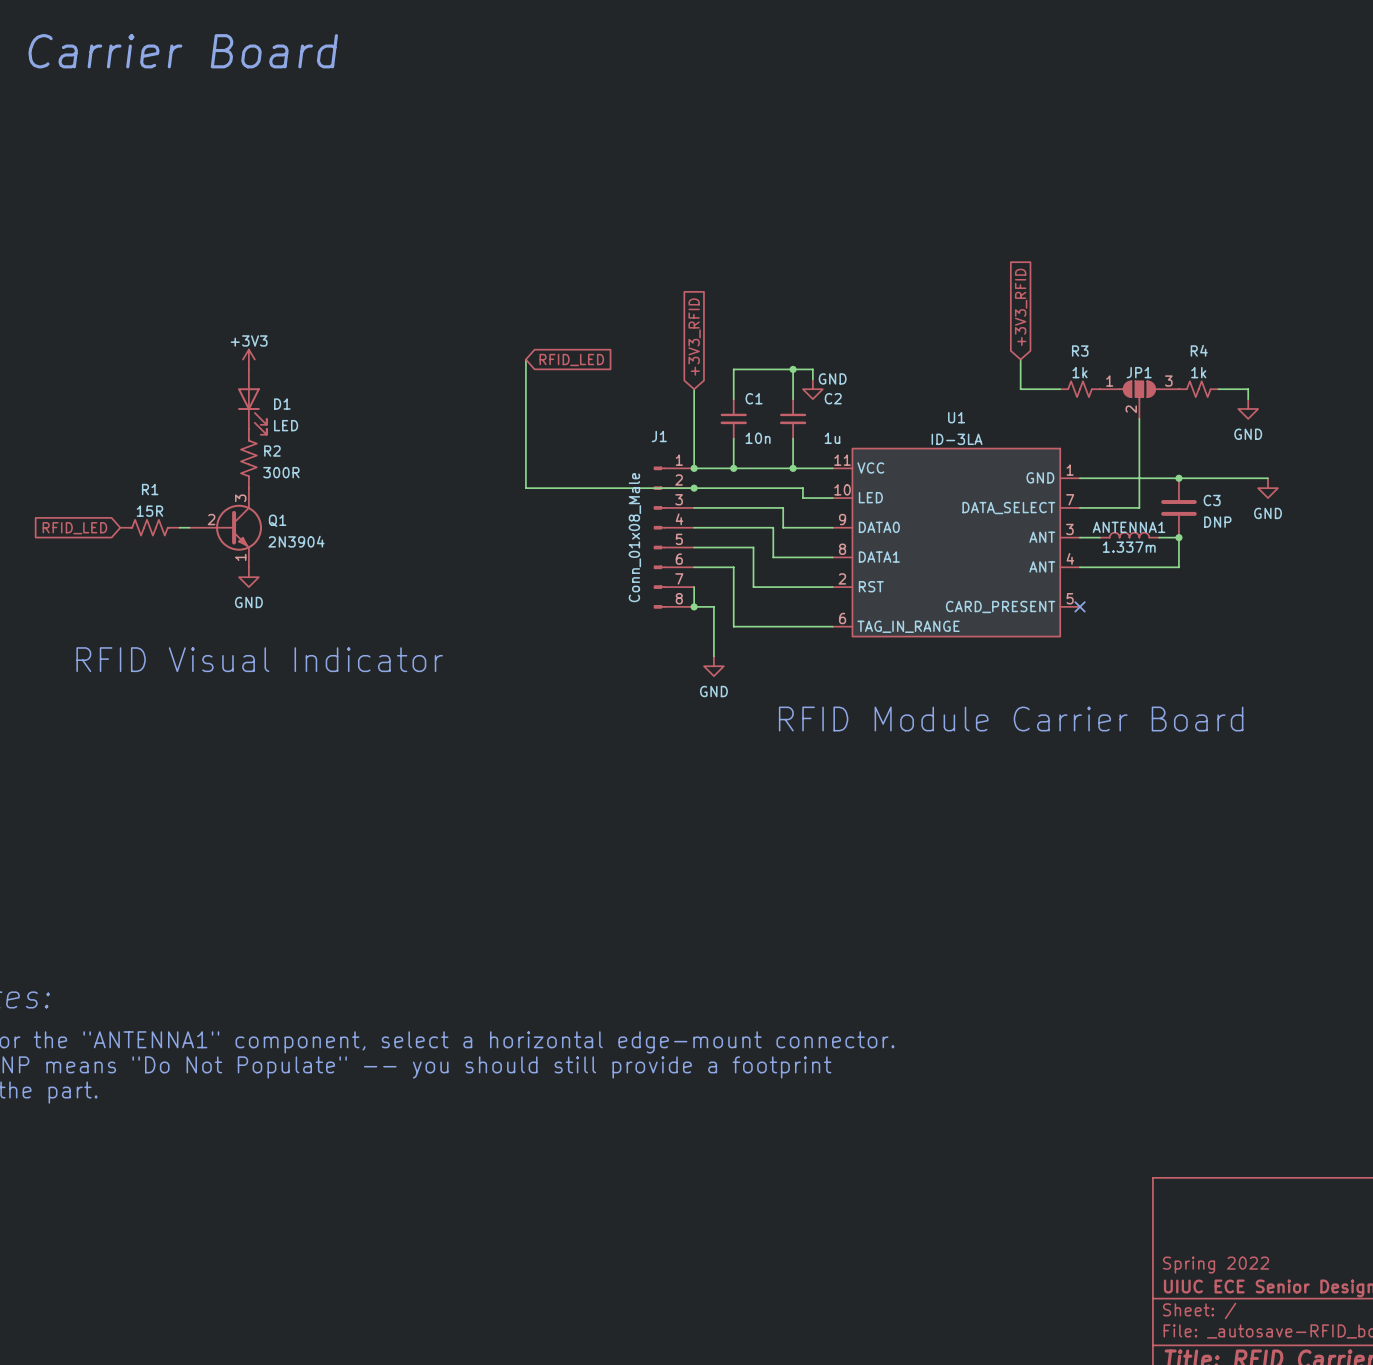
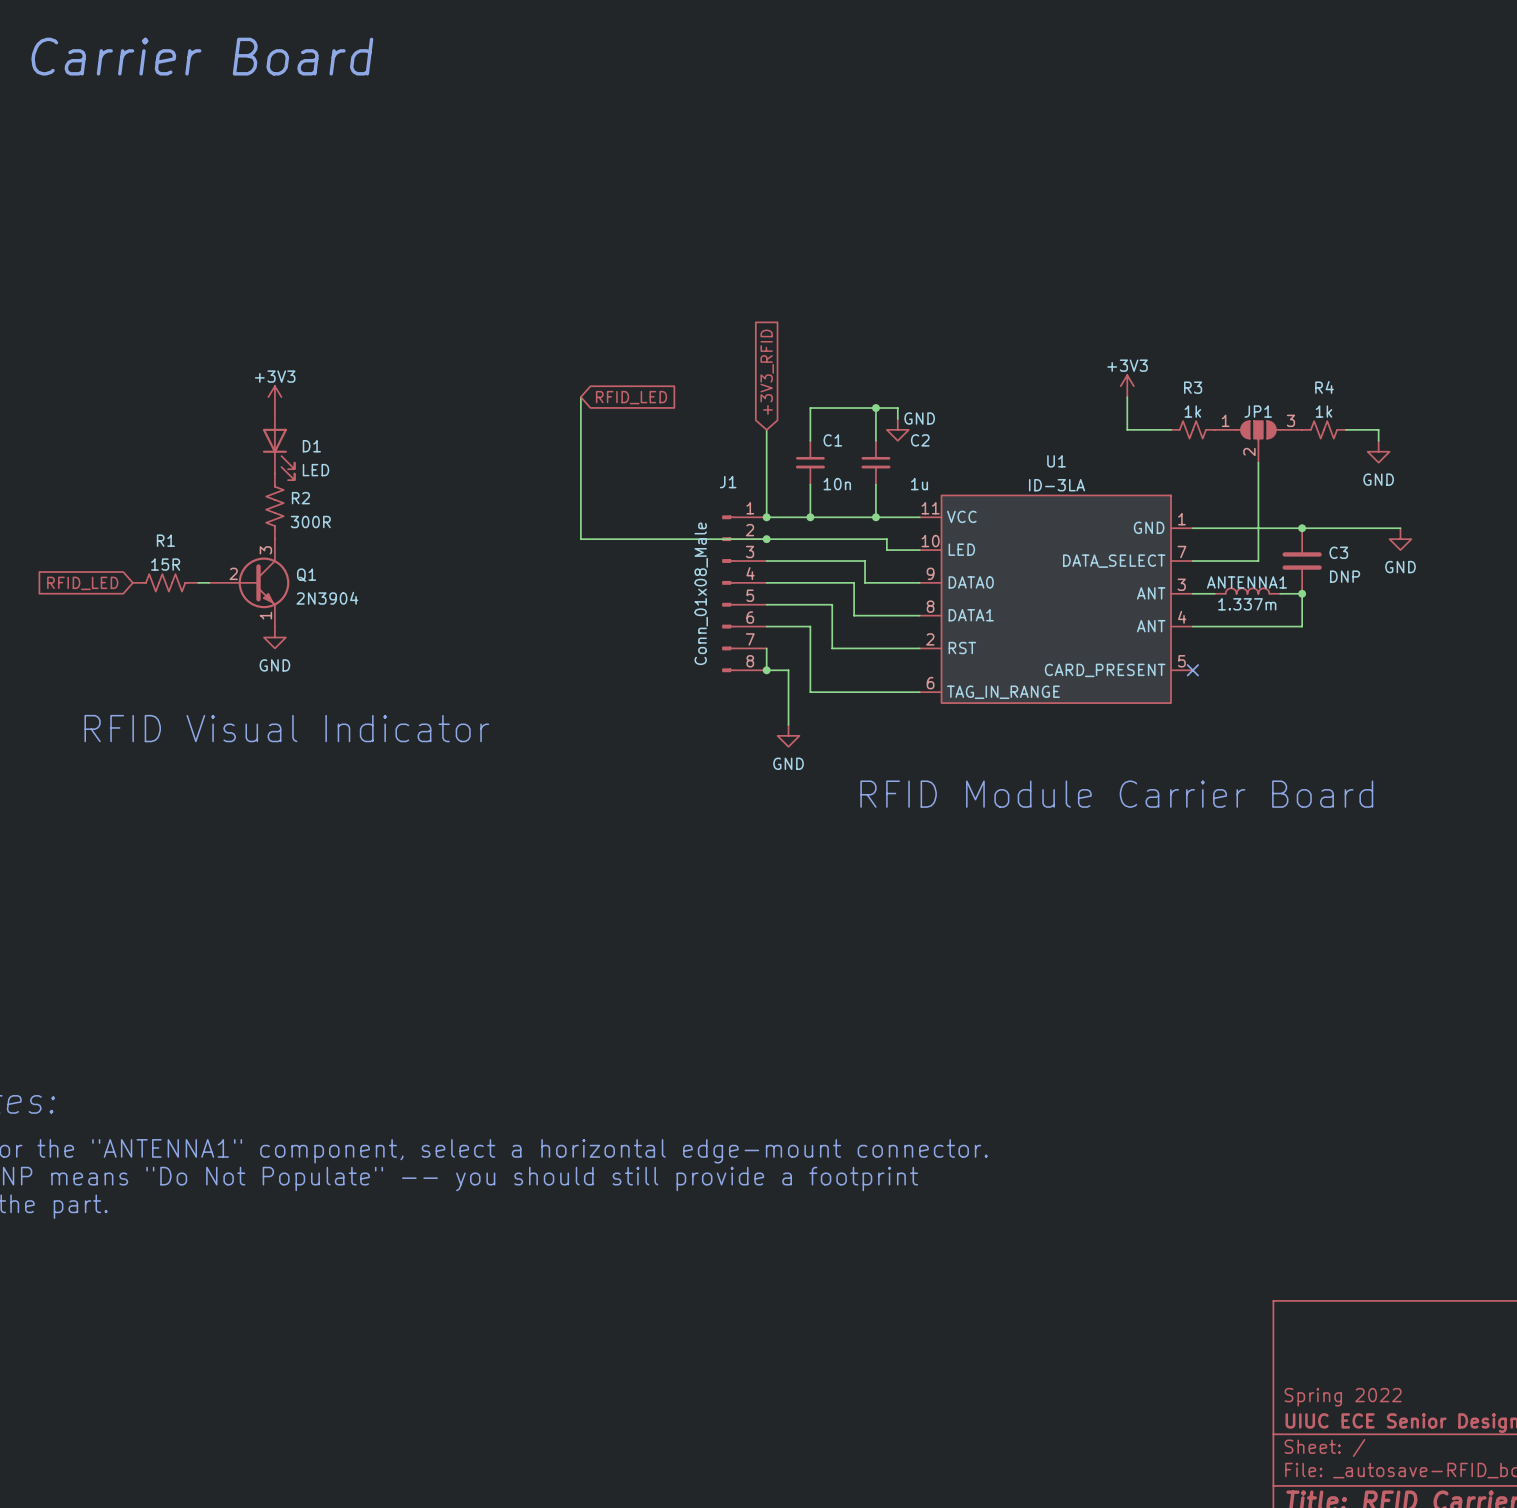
global label: +3V3_RFID (1021, 307) -> none
power symbol: none -> +3V3 (1127, 386)

